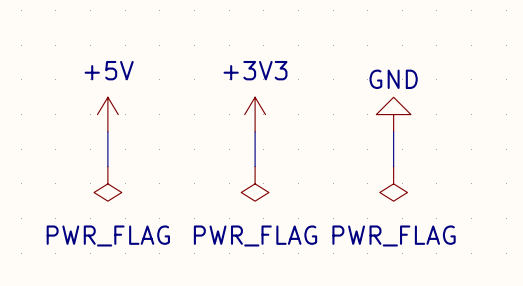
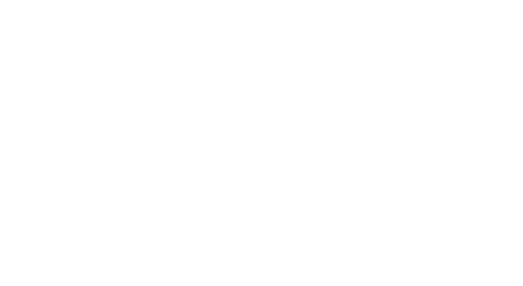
power symbol: +5V (107, 114) -> none
power symbol: +3V3 (255, 114) -> none
power symbol: GND (393, 114) -> none
wire: (107, 131) (107, 166) -> none
wire: (255, 131) (255, 166) -> none
wire: (393, 131) (393, 166) -> none
power symbol: PWR_FLAG (107, 183) -> none
power symbol: PWR_FLAG (255, 183) -> none
power symbol: PWR_FLAG (393, 183) -> none

